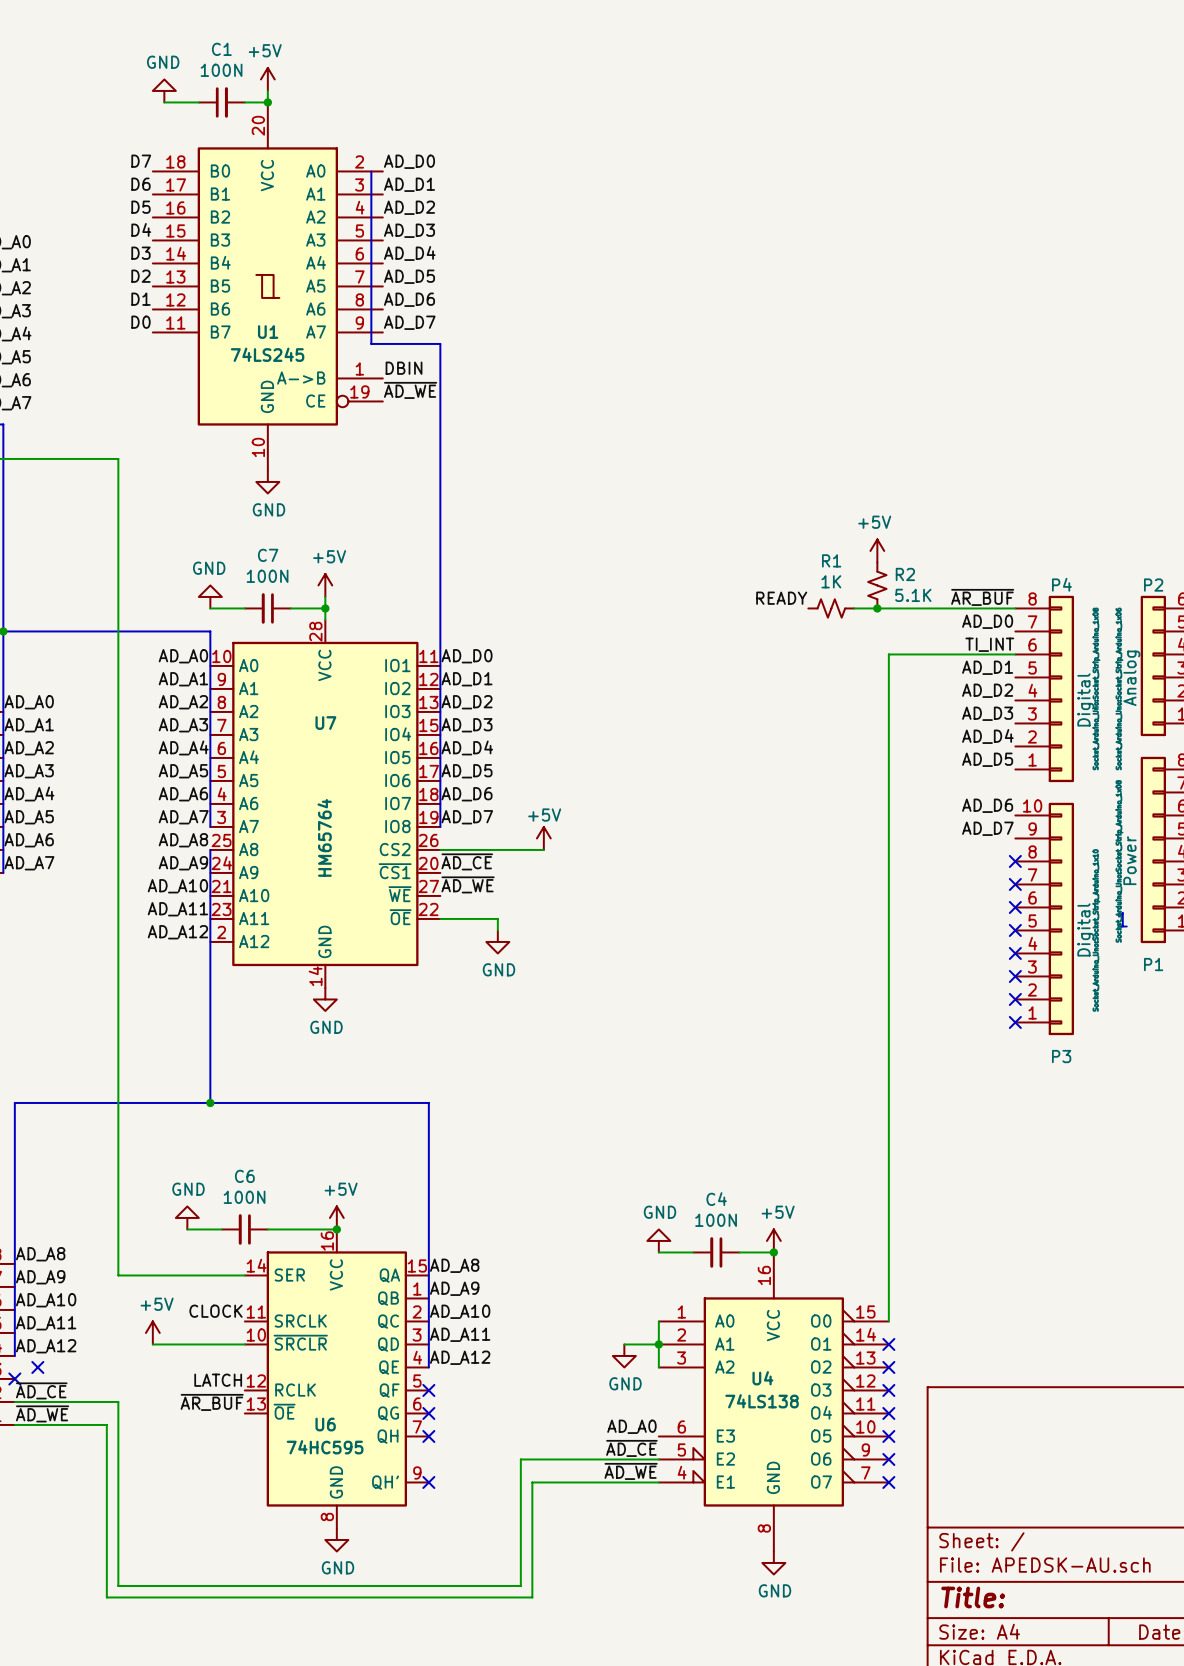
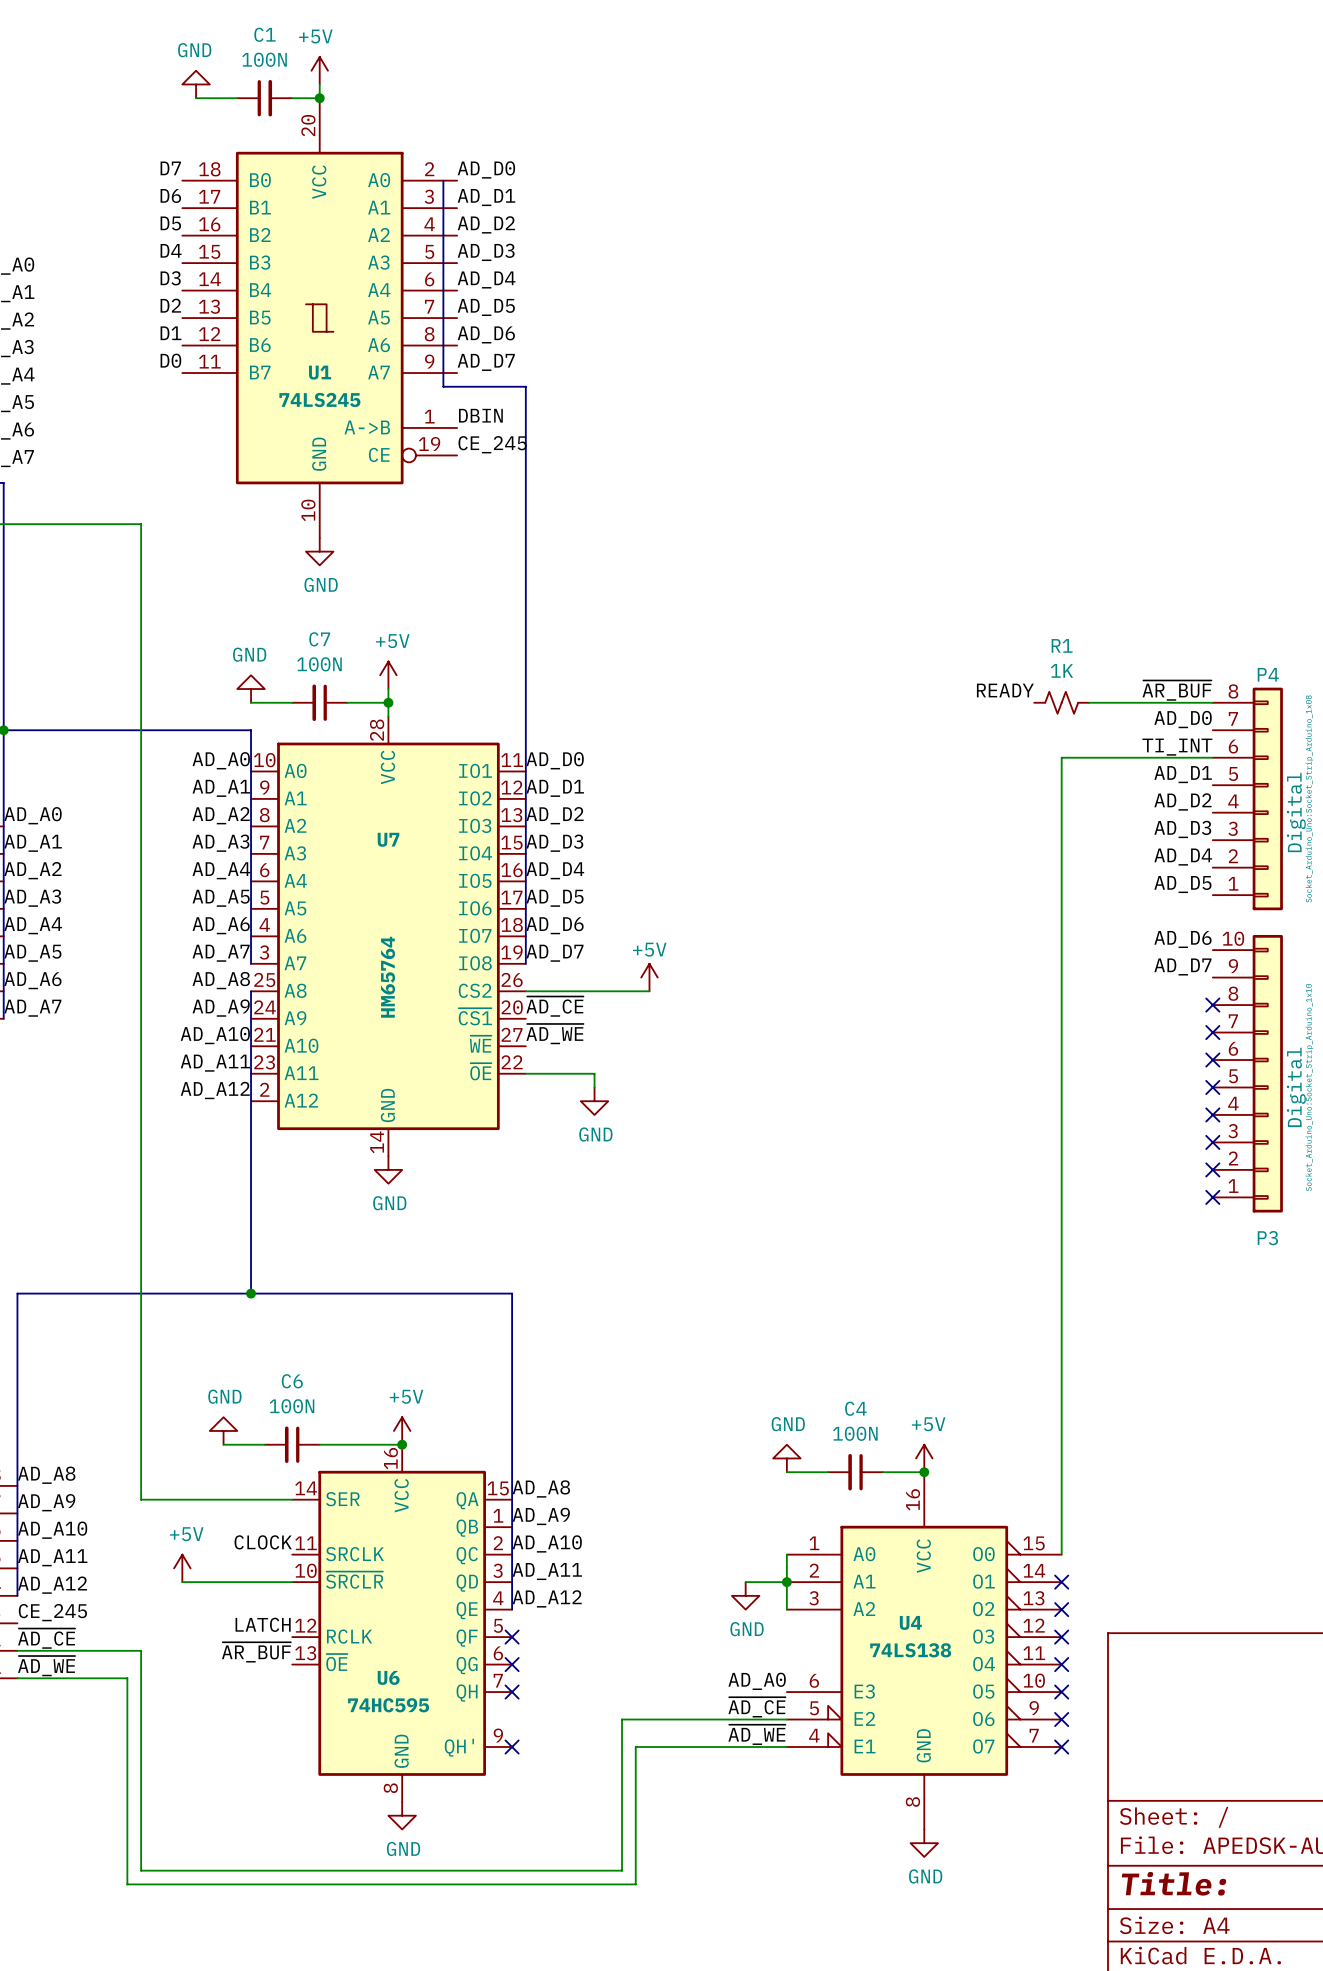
label: ~{AD_WE} (410, 390) -> CE_245 (492, 444)
power symbol: +5V (877, 550) -> none
R2: 5.1K (877, 585) -> none
label position: READY (781, 598) -> READY (1005, 690)
R1 position: (831, 608) -> (1061, 702)
wire: (854, 608) (911, 608) -> none
junction: (877, 608) -> none
no-connect mark: (37, 1367) -> none
label: none -> CE_245 (52, 1612)
no-connect mark: (14, 1378) -> none

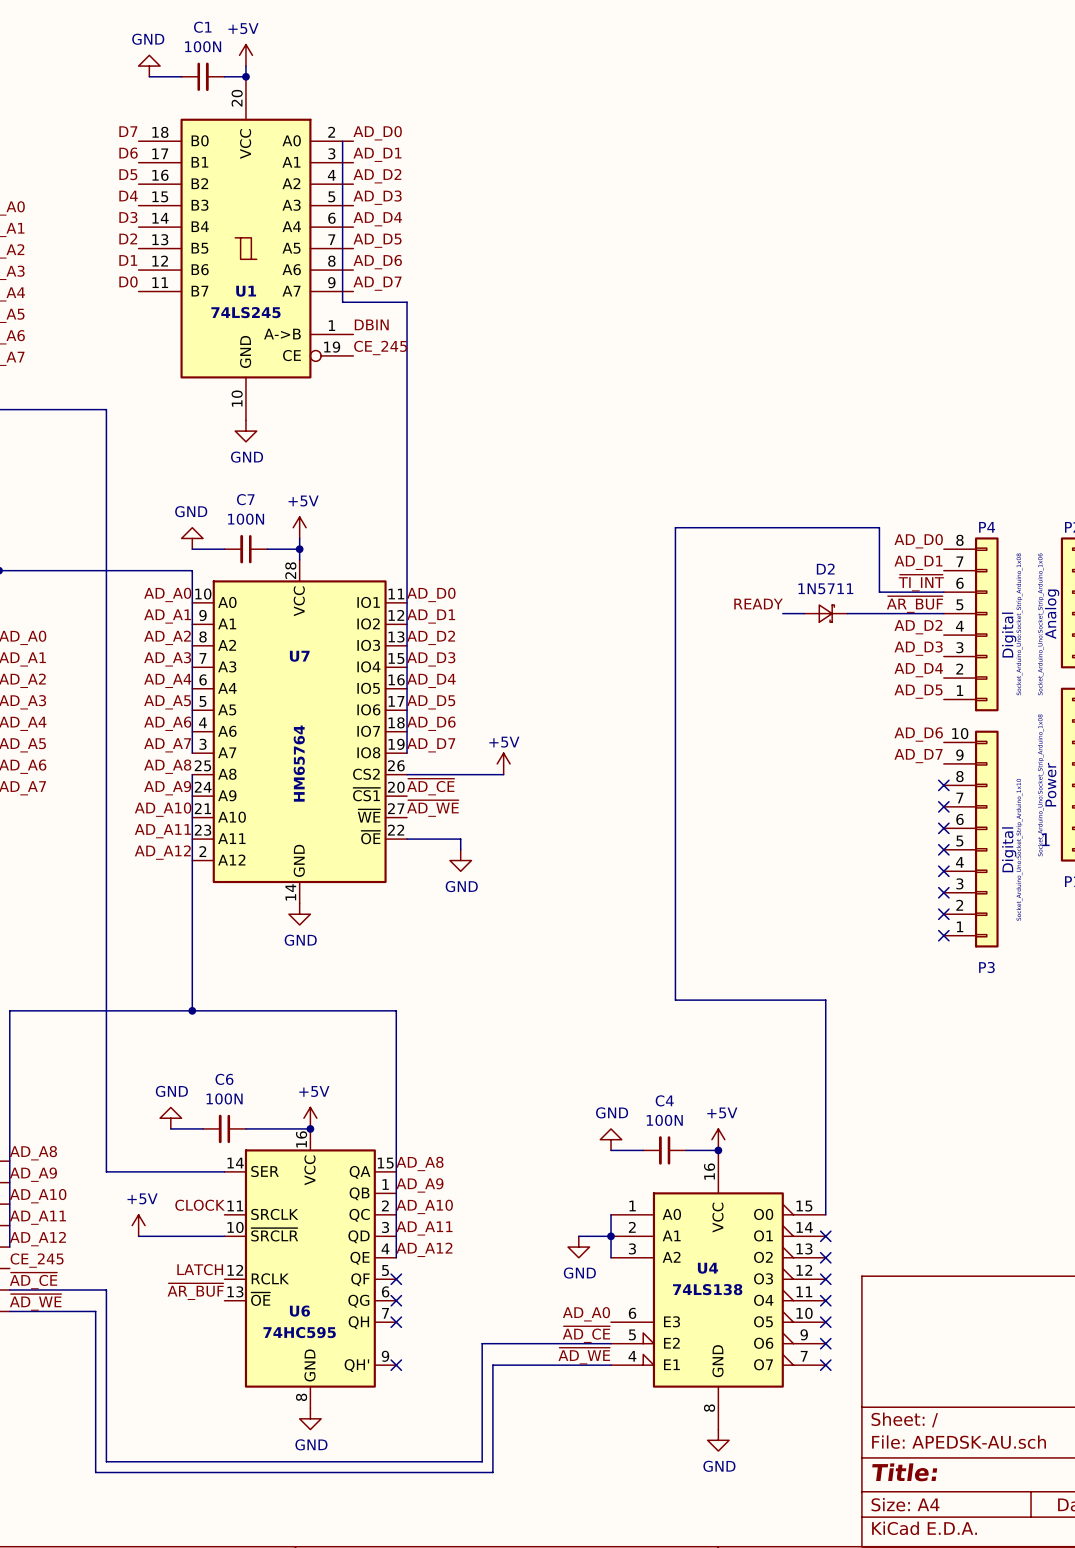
label position: READY (1005, 690) -> READY (758, 604)
label: ~{AR_BUF} (1177, 690) -> AD_D0 (918, 541)
R1: 1K (1061, 702) -> none
wire: (1089, 702) (1212, 702) -> (847, 613) (943, 613)
label: AD_D0 (1183, 719) -> AD_D1 (918, 562)
label: TI_INT (1177, 747) -> ~{TI_INT} (921, 583)
wire: (1130, 757) (1061, 757) (1061, 1279) -> (879, 592) (879, 527) (675, 527) (675, 1000) (825, 1000)
label: AD_D1 (1183, 774) -> ~{AR_BUF} (914, 604)
wire: none -> (782, 613) (804, 613)
D2: none -> 1N5711 (825, 613)

